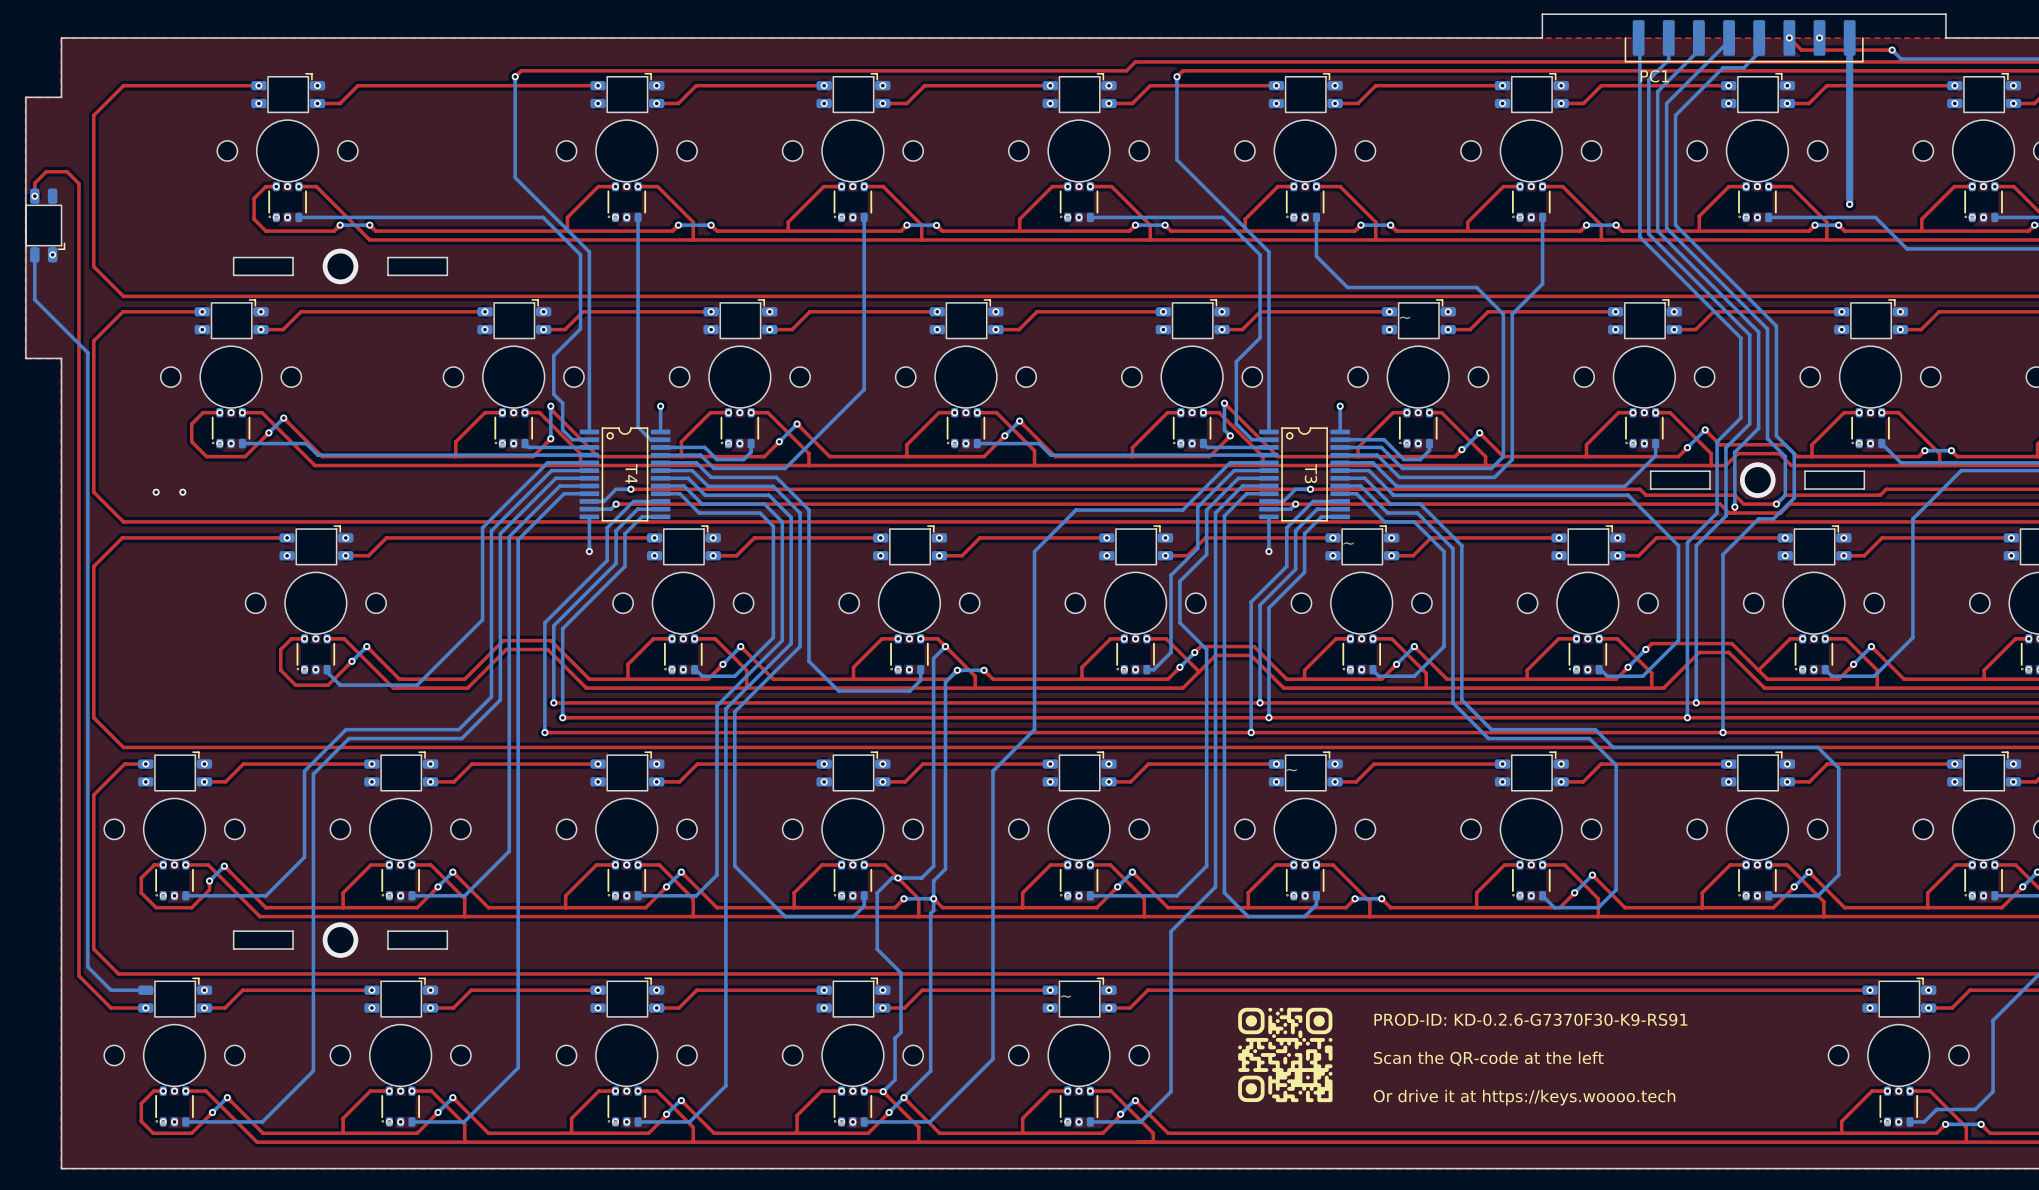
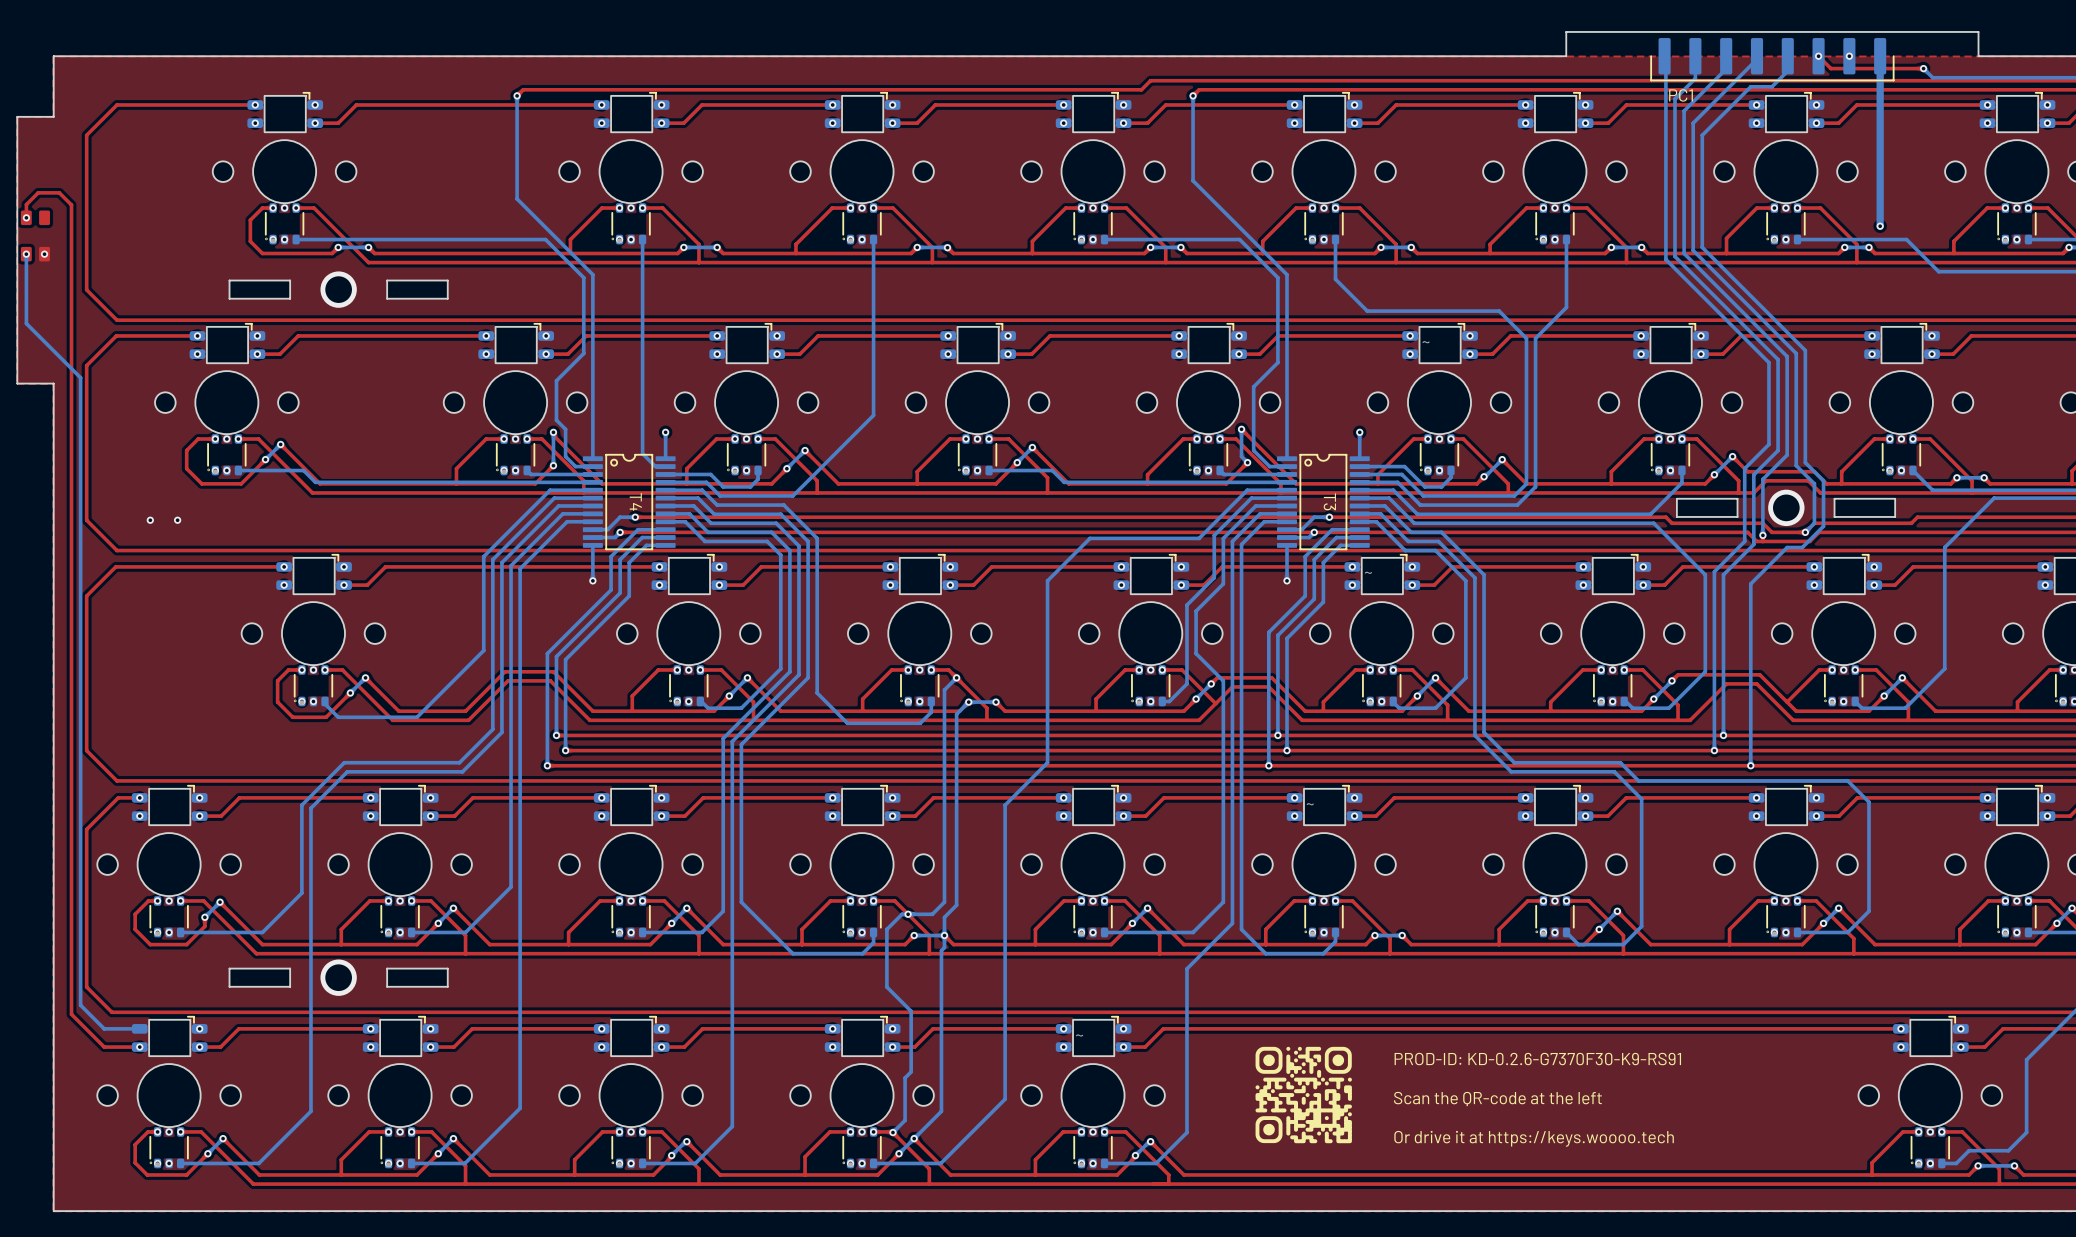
part footprint: [25, 188, 66, 263] -> [20, 210, 50, 262]
bottom track: none -> (26, 254) (26, 277)
via: none -> (26, 254)
via: none -> (44, 254)
via: (52, 254) -> none

